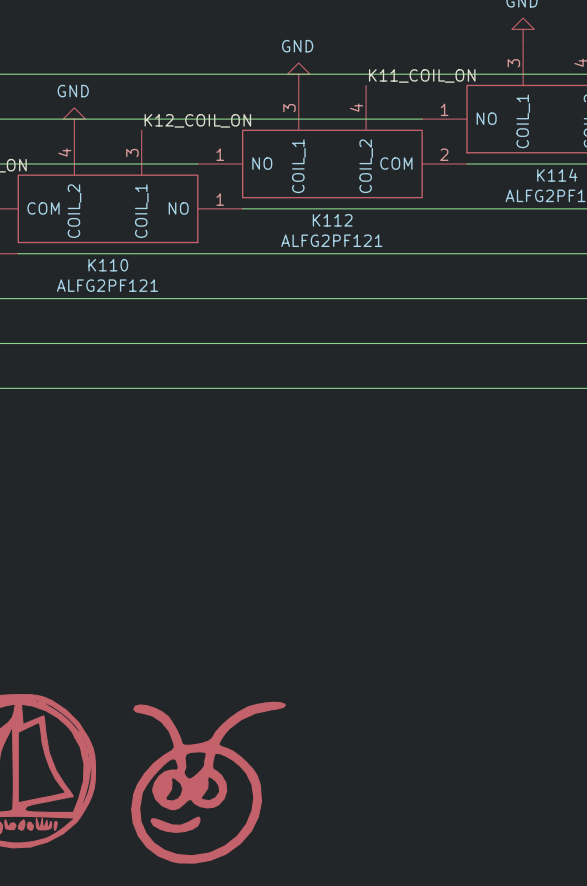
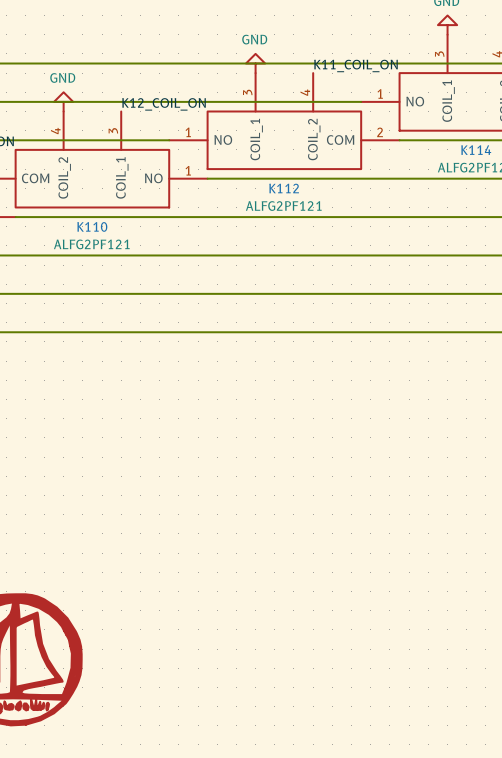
part: (208, 782) -> none

